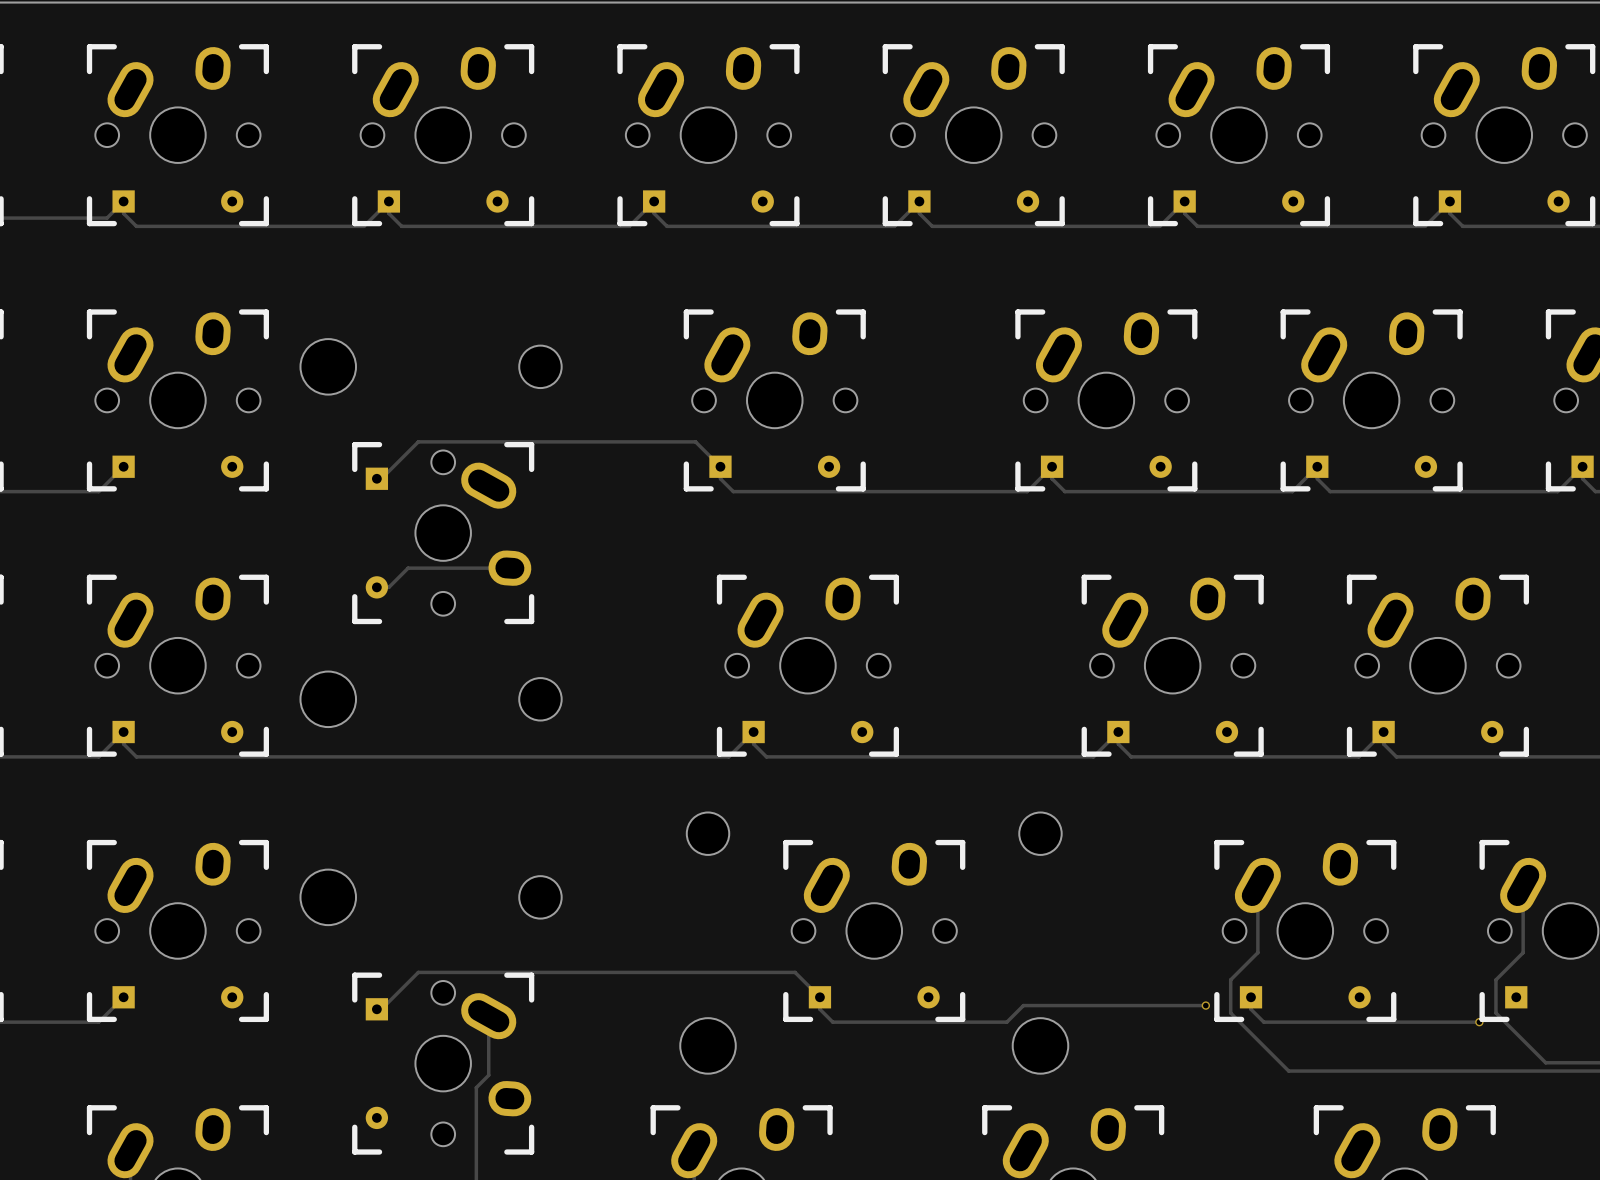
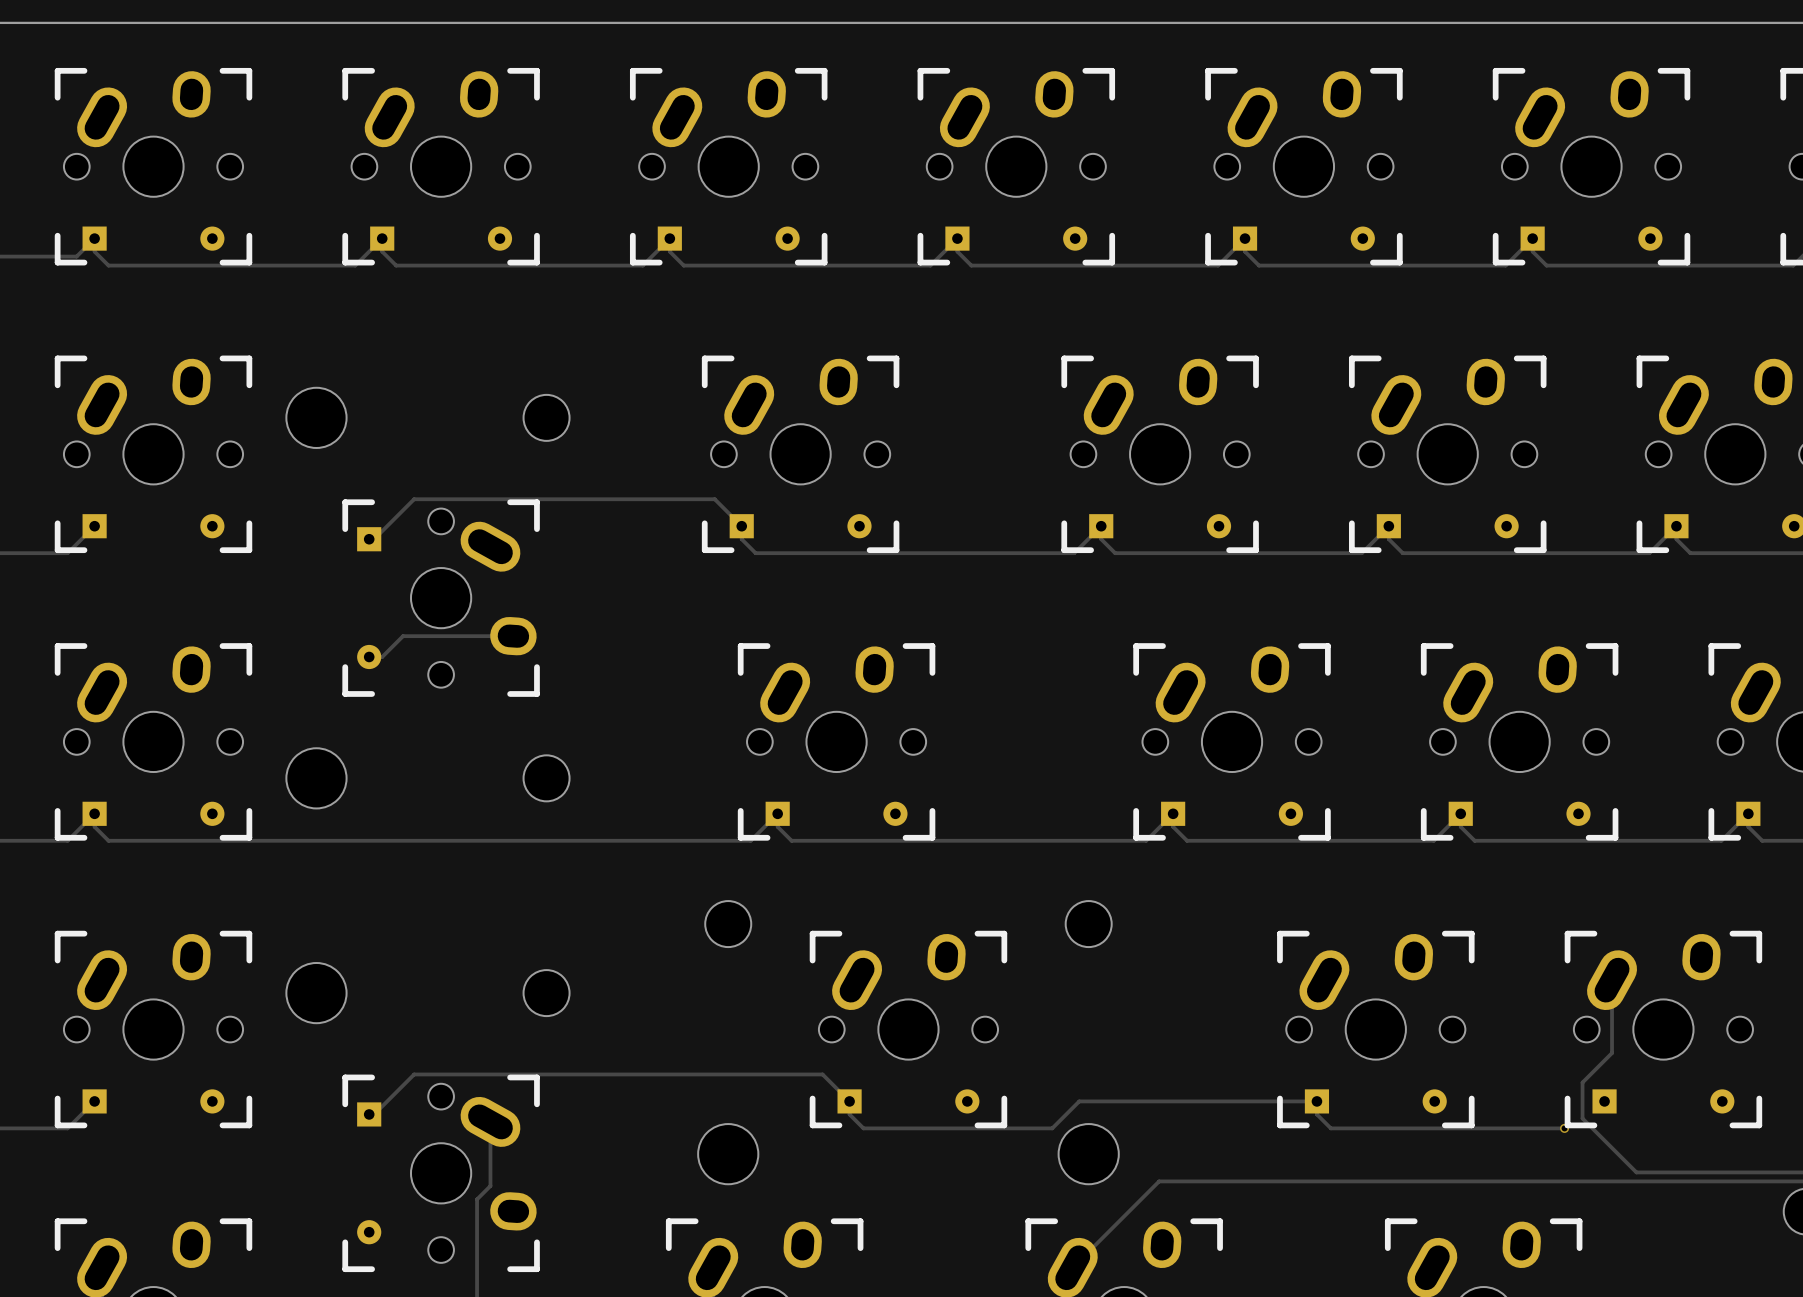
track: (1257, 885) (1257, 952) (1230, 979) (1230, 1013) (1288, 1071) -> (1072, 1267) (1159, 1181) (1357, 1181)
track: (1023, 1005) (1205, 1005) -> (1070, 1110) (1079, 1101) (1316, 1101)
via: (1205, 1005) -> none

